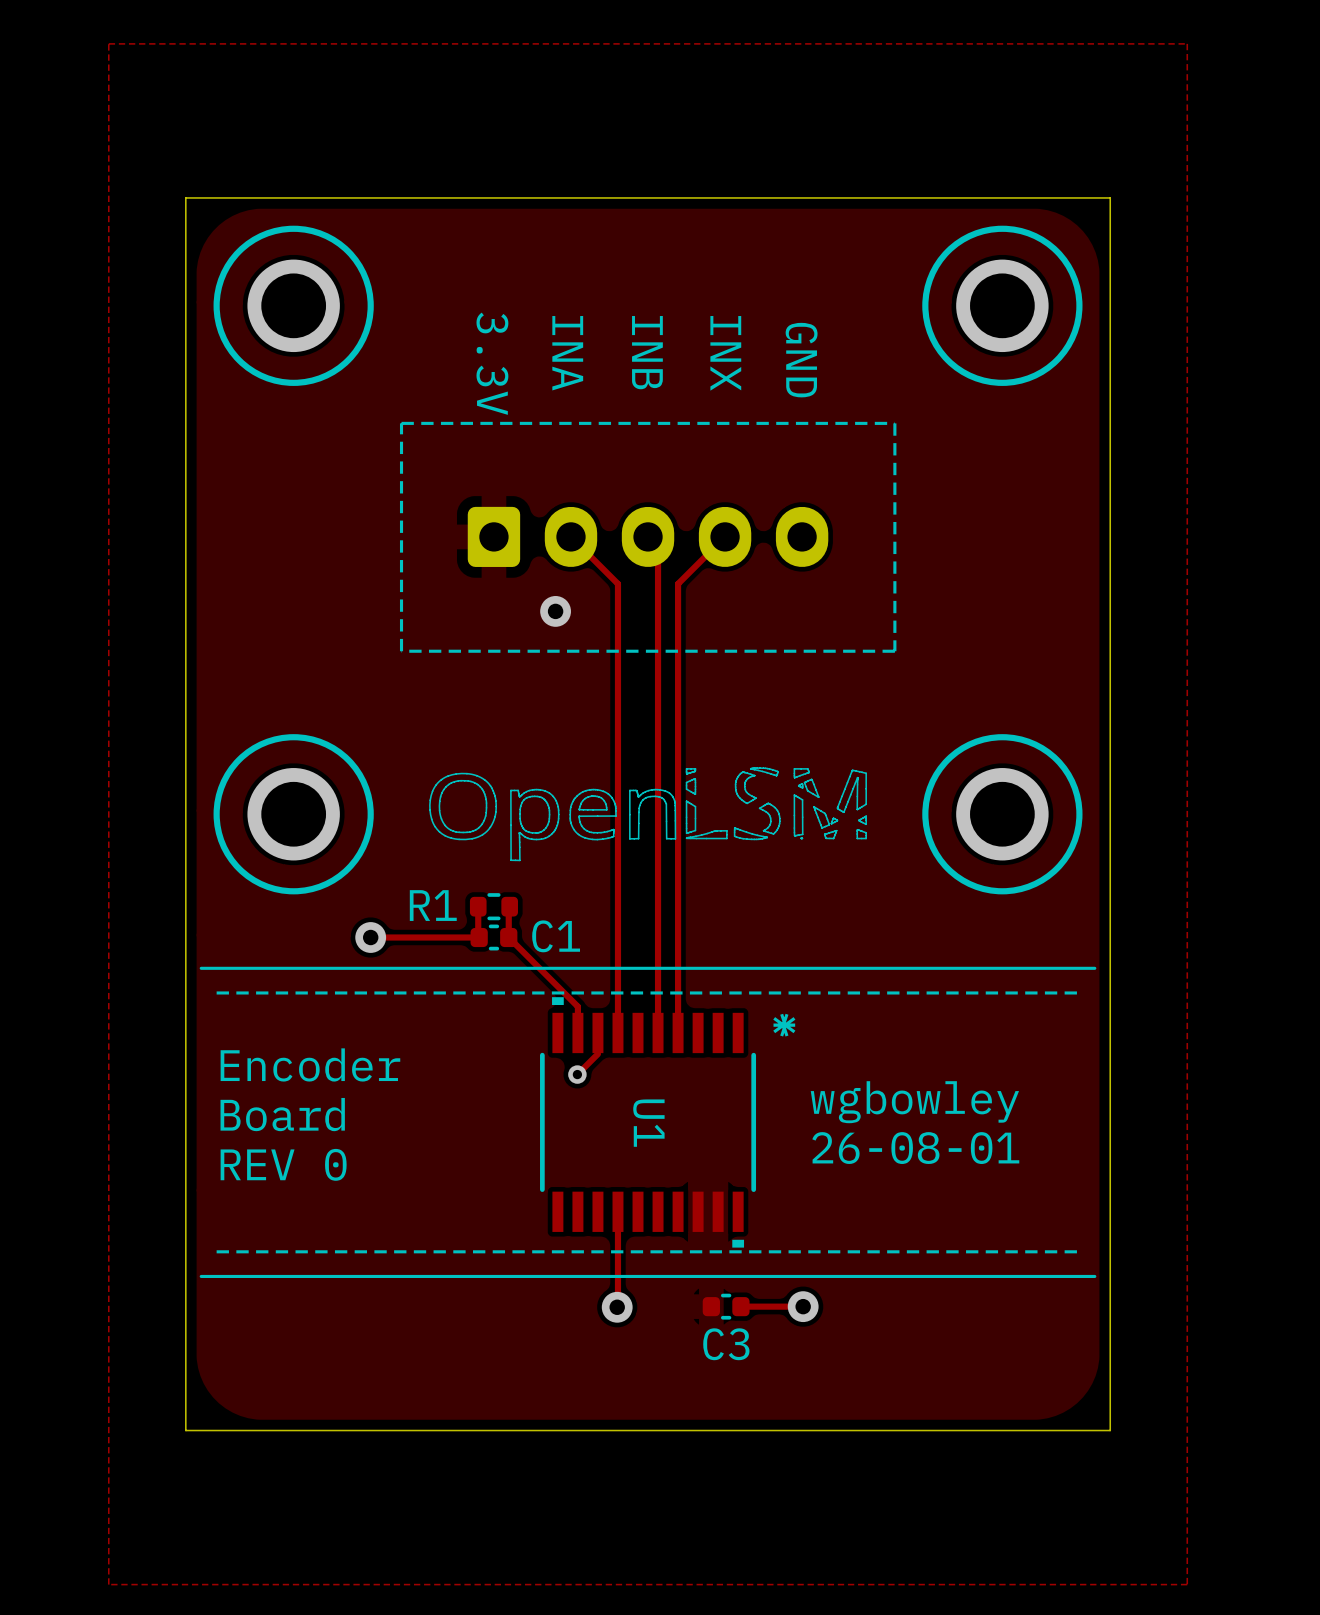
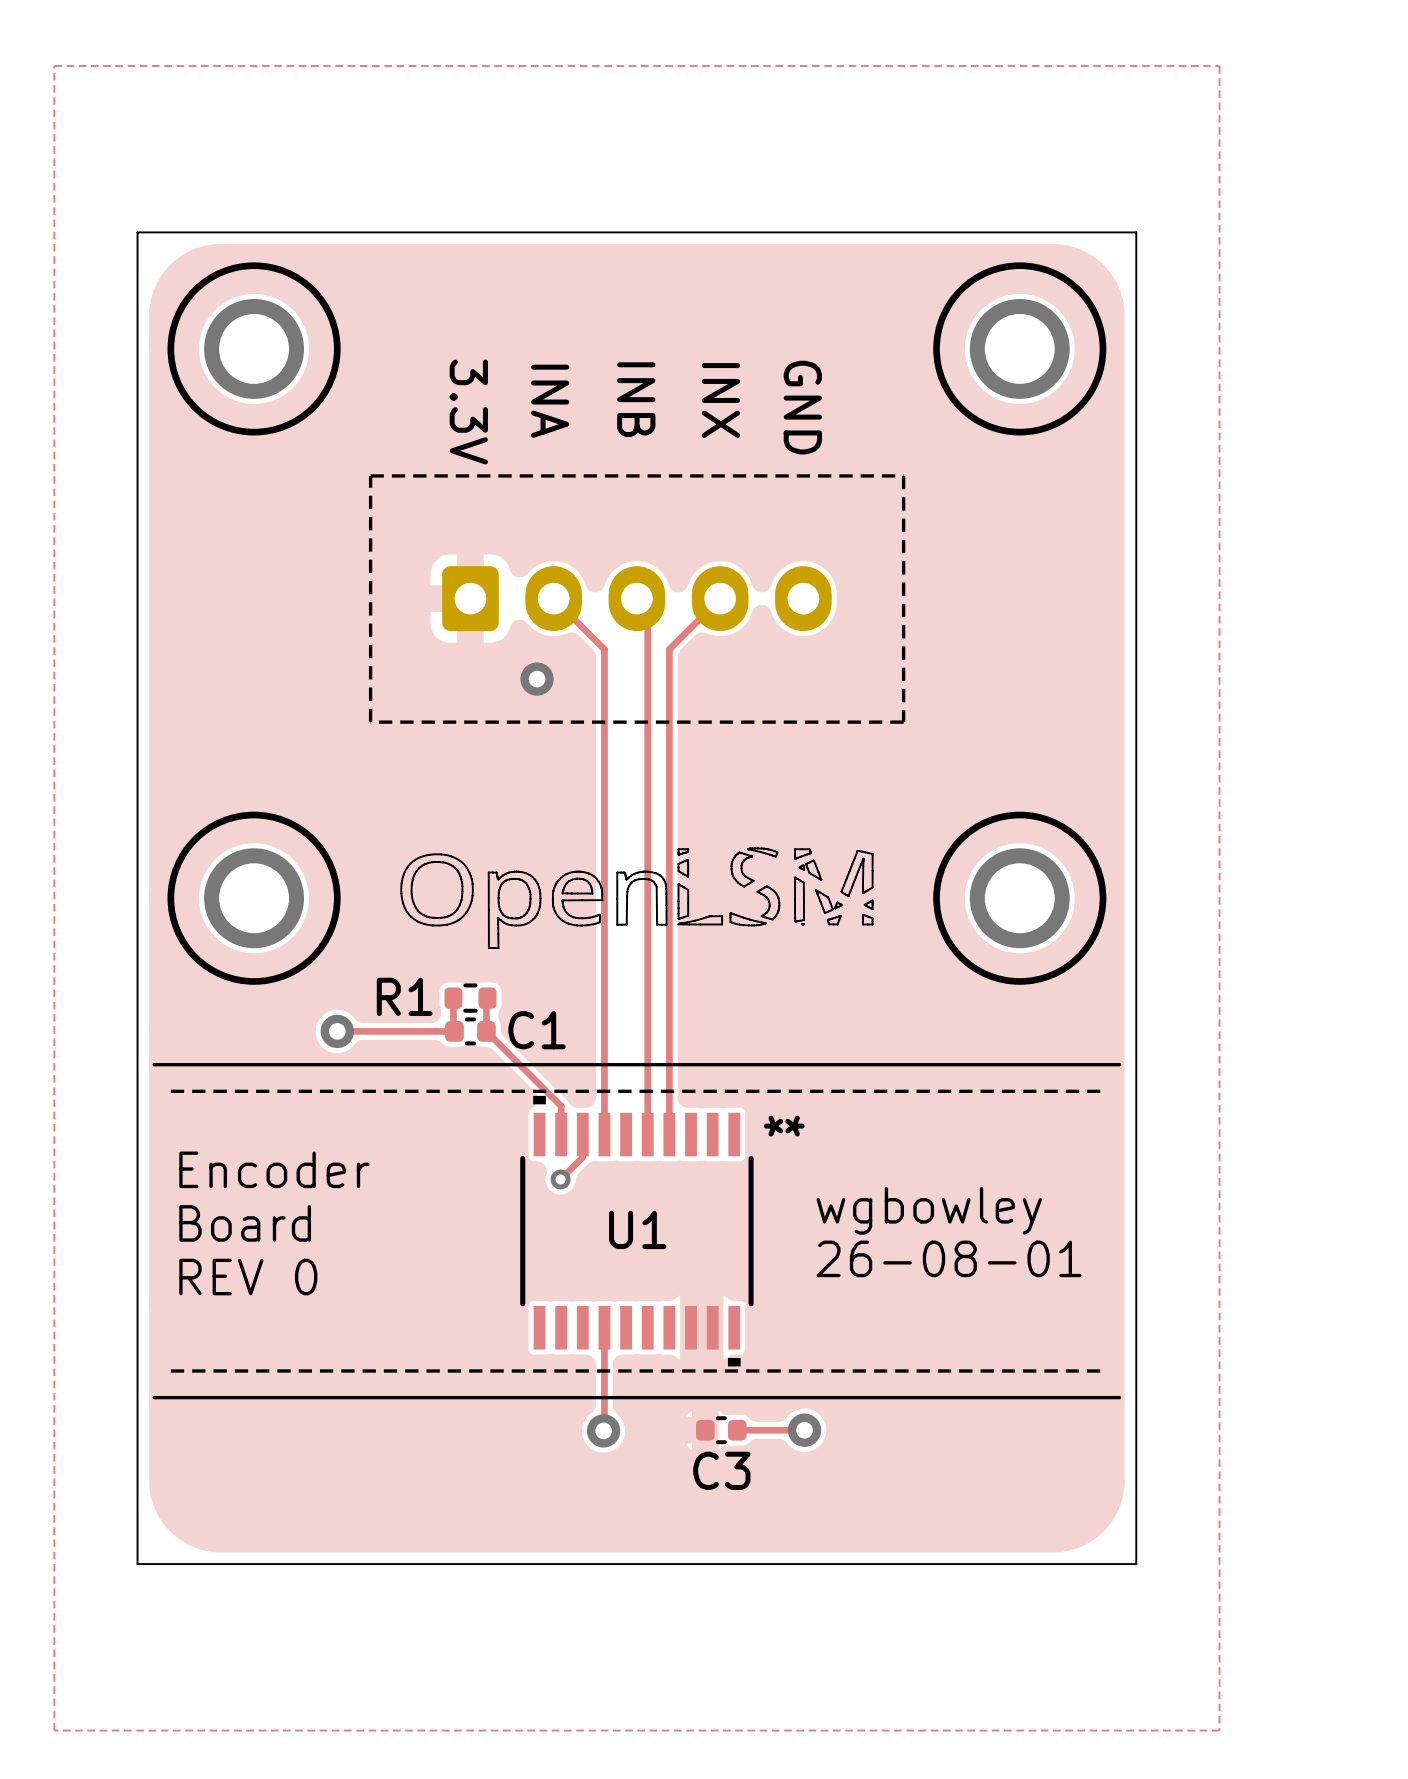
U1 name rotation: 0° (648, 1123) -> 90° counterclockwise (637, 1229)

